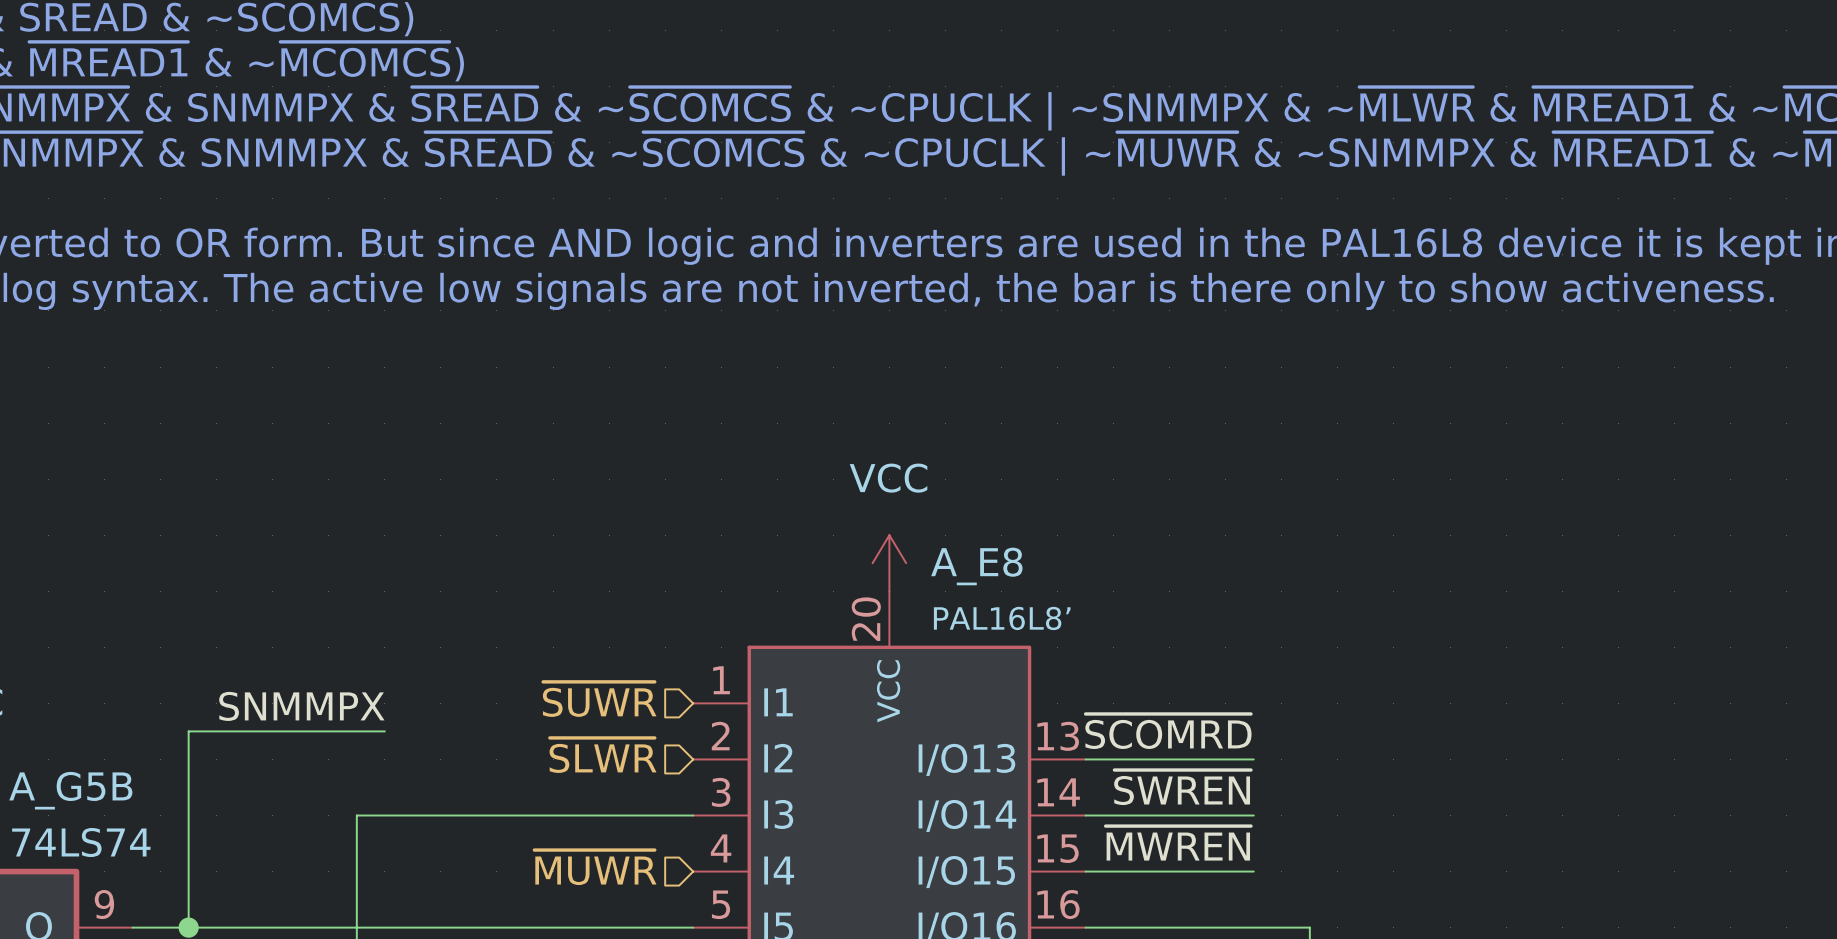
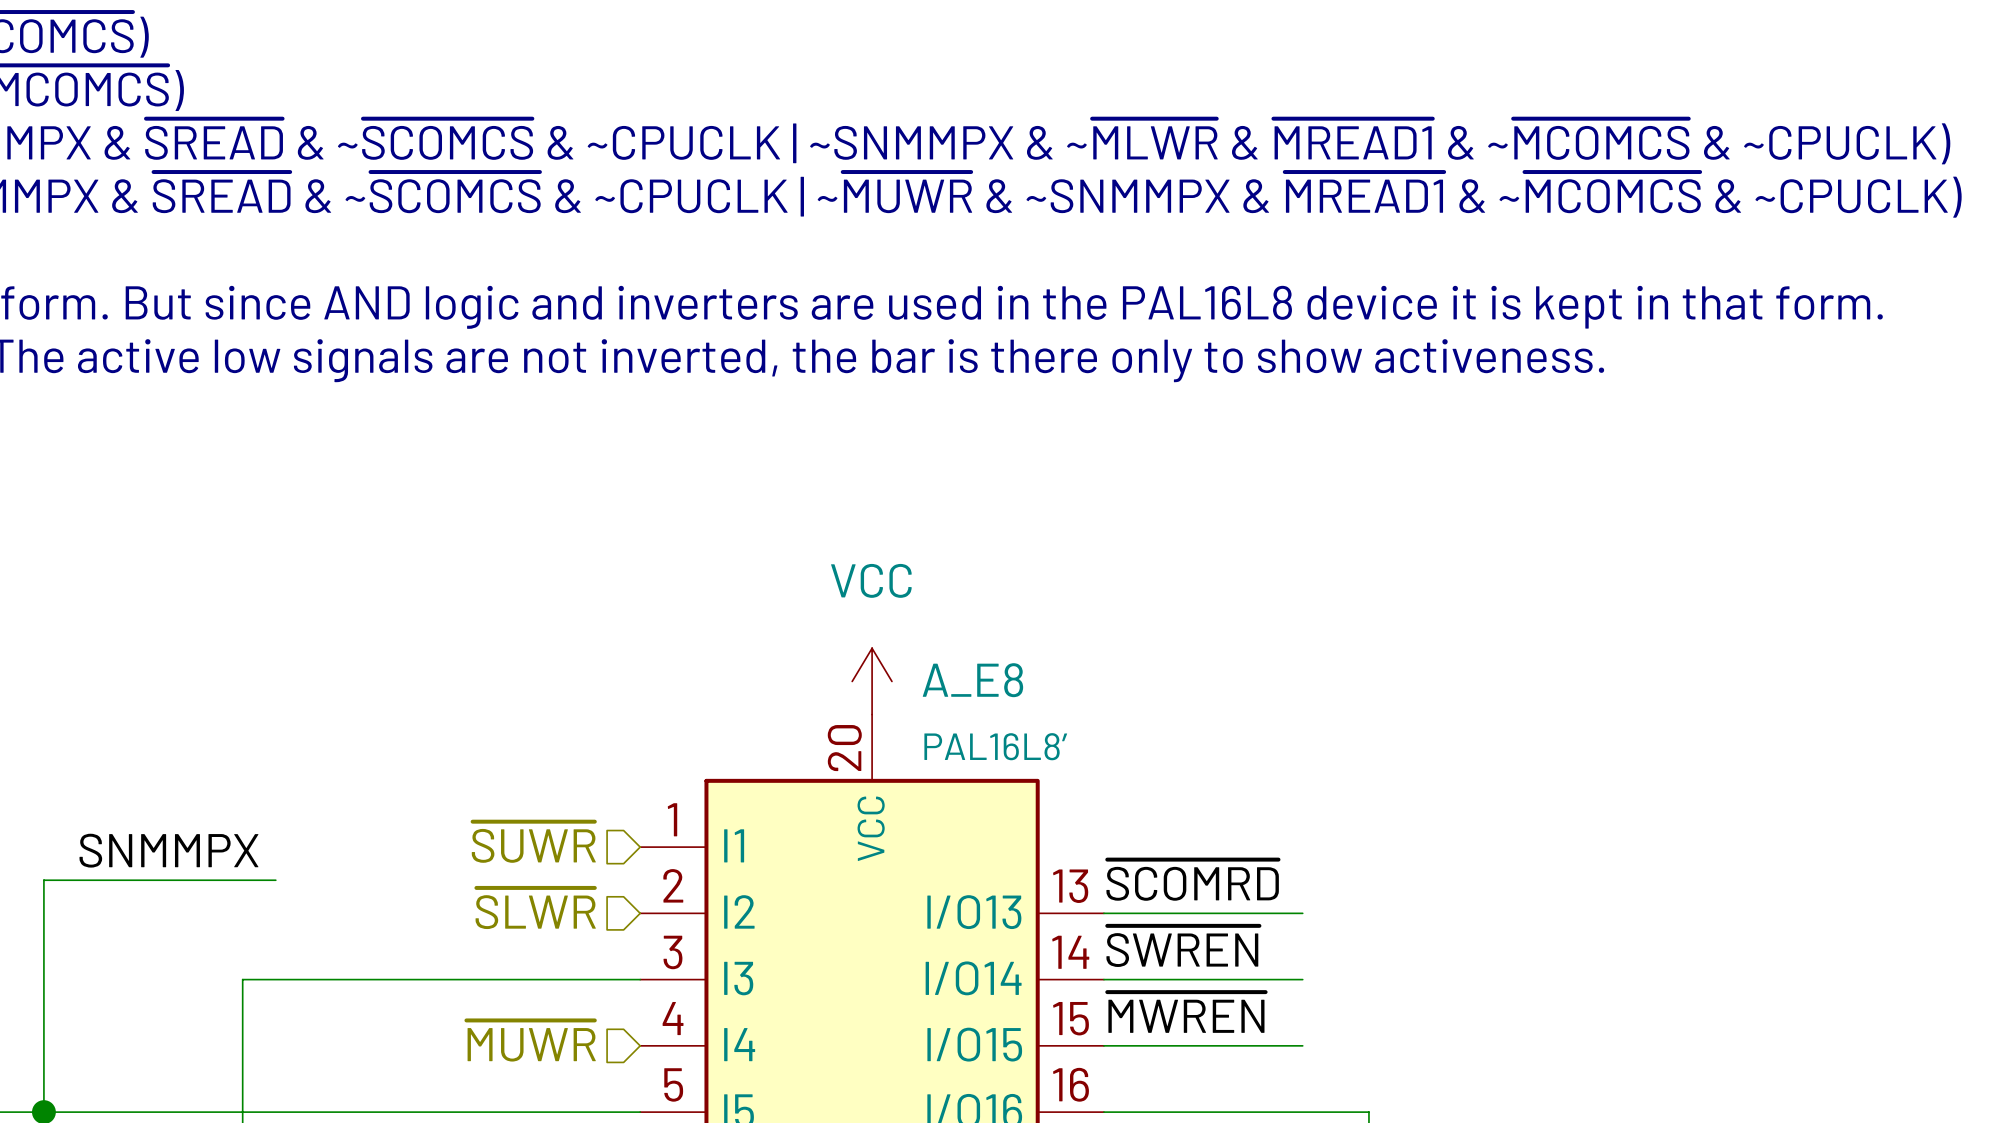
label position: ~{SCOMRD} (1168, 731) -> ~{SCOMRD} (1192, 880)
label position: ~{SWREN} (1182, 787) -> ~{SWREN} (1182, 946)
label position: ~{MWREN} (1178, 843) -> ~{MWREN} (1186, 1012)

